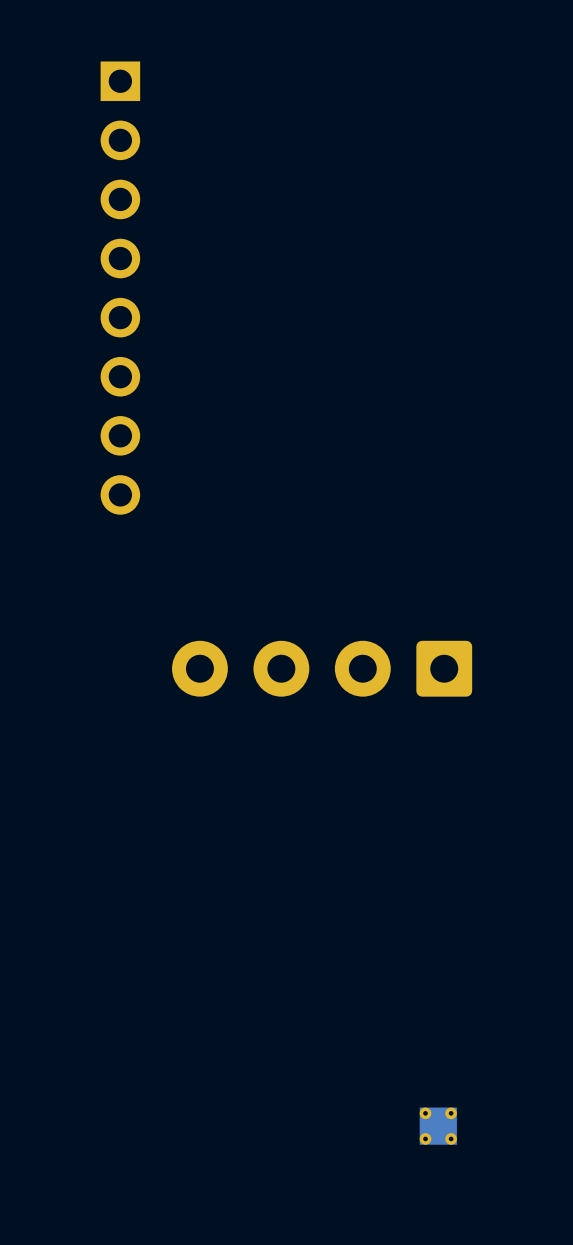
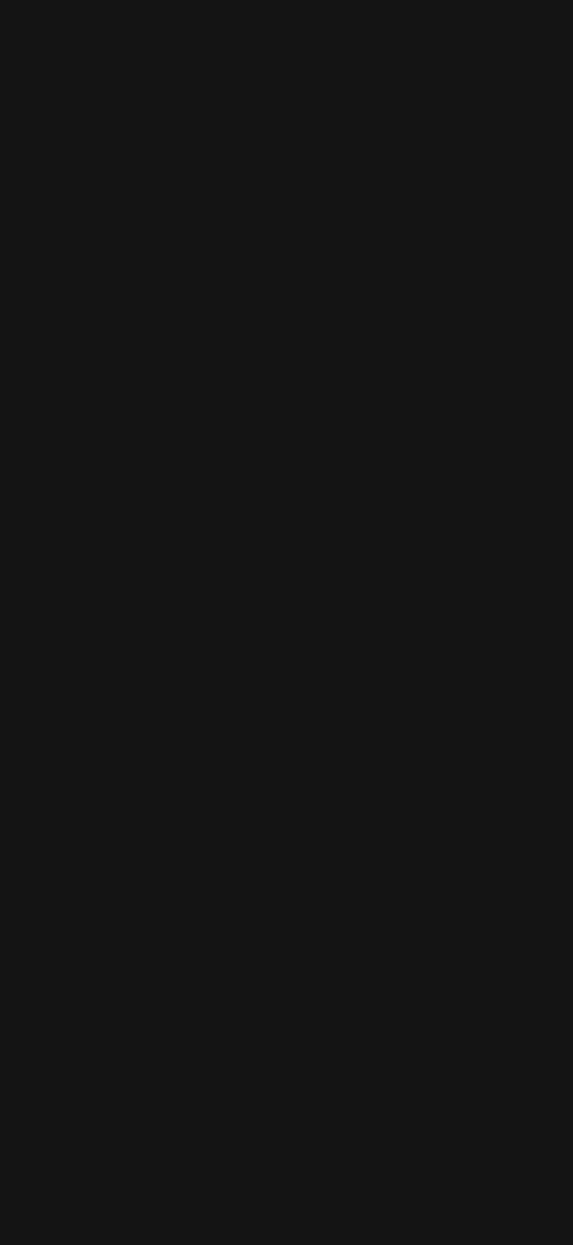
part: (120, 288) -> none
part: (322, 668) -> none
part: (438, 1126) -> none

